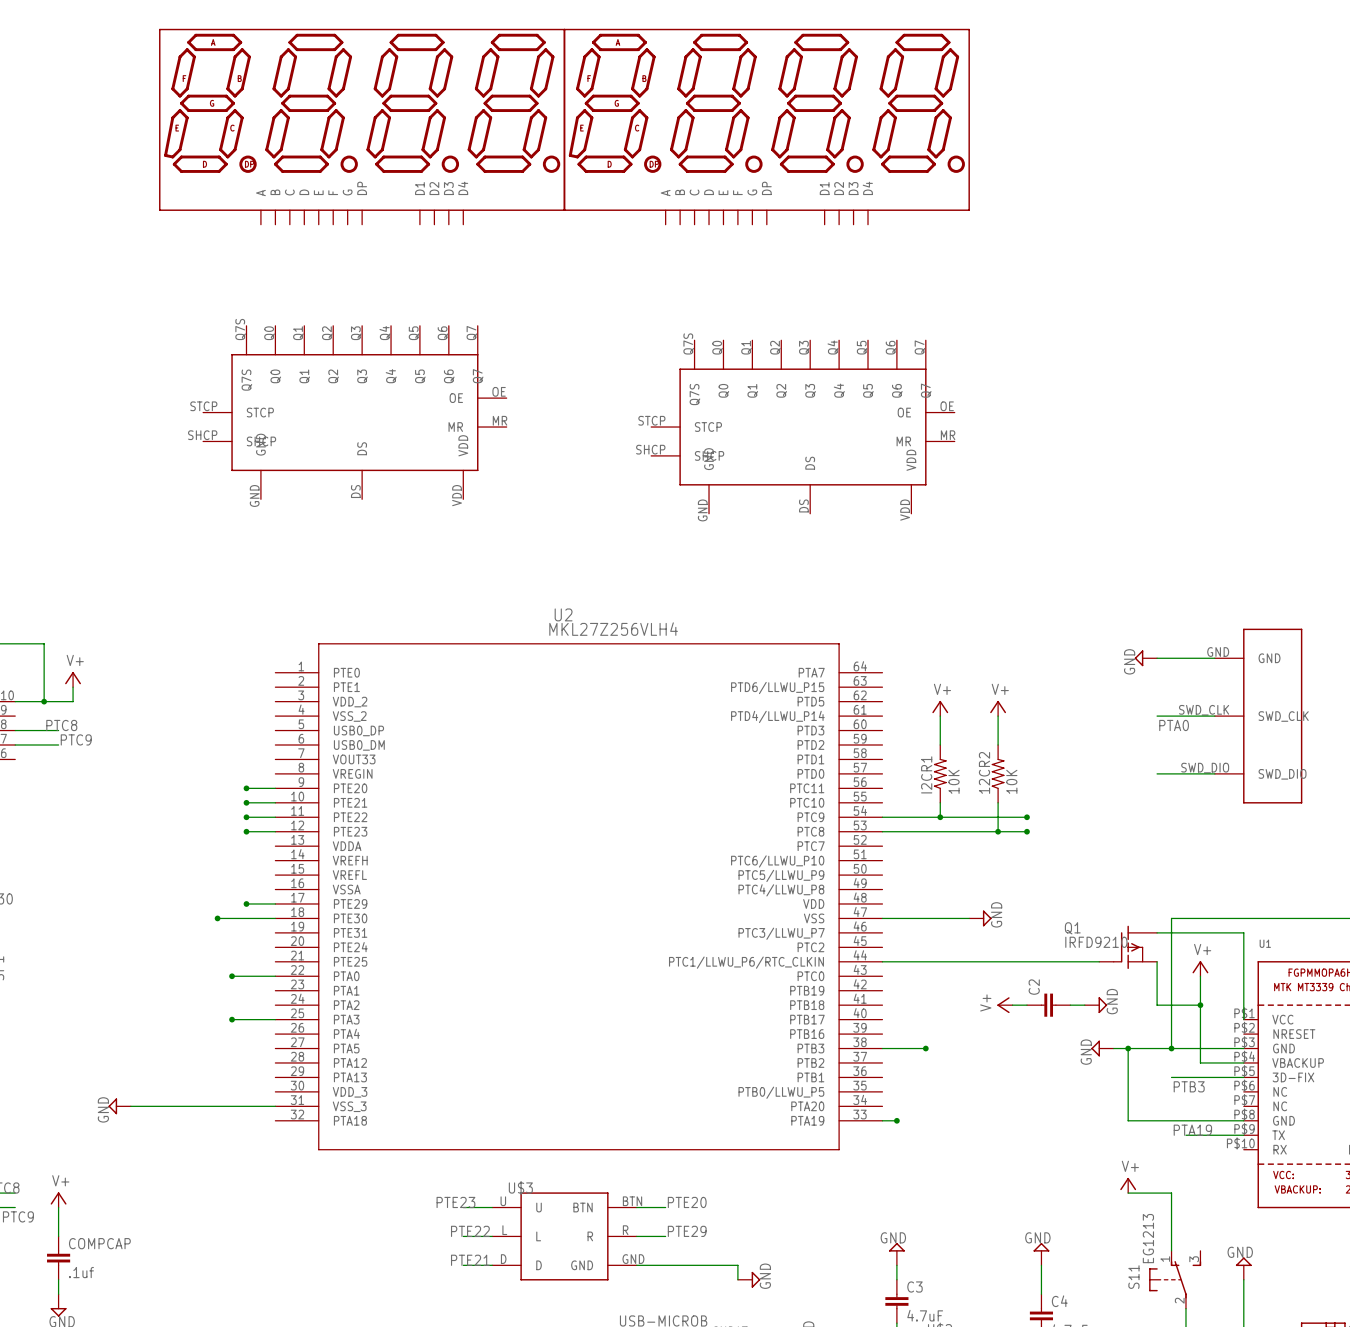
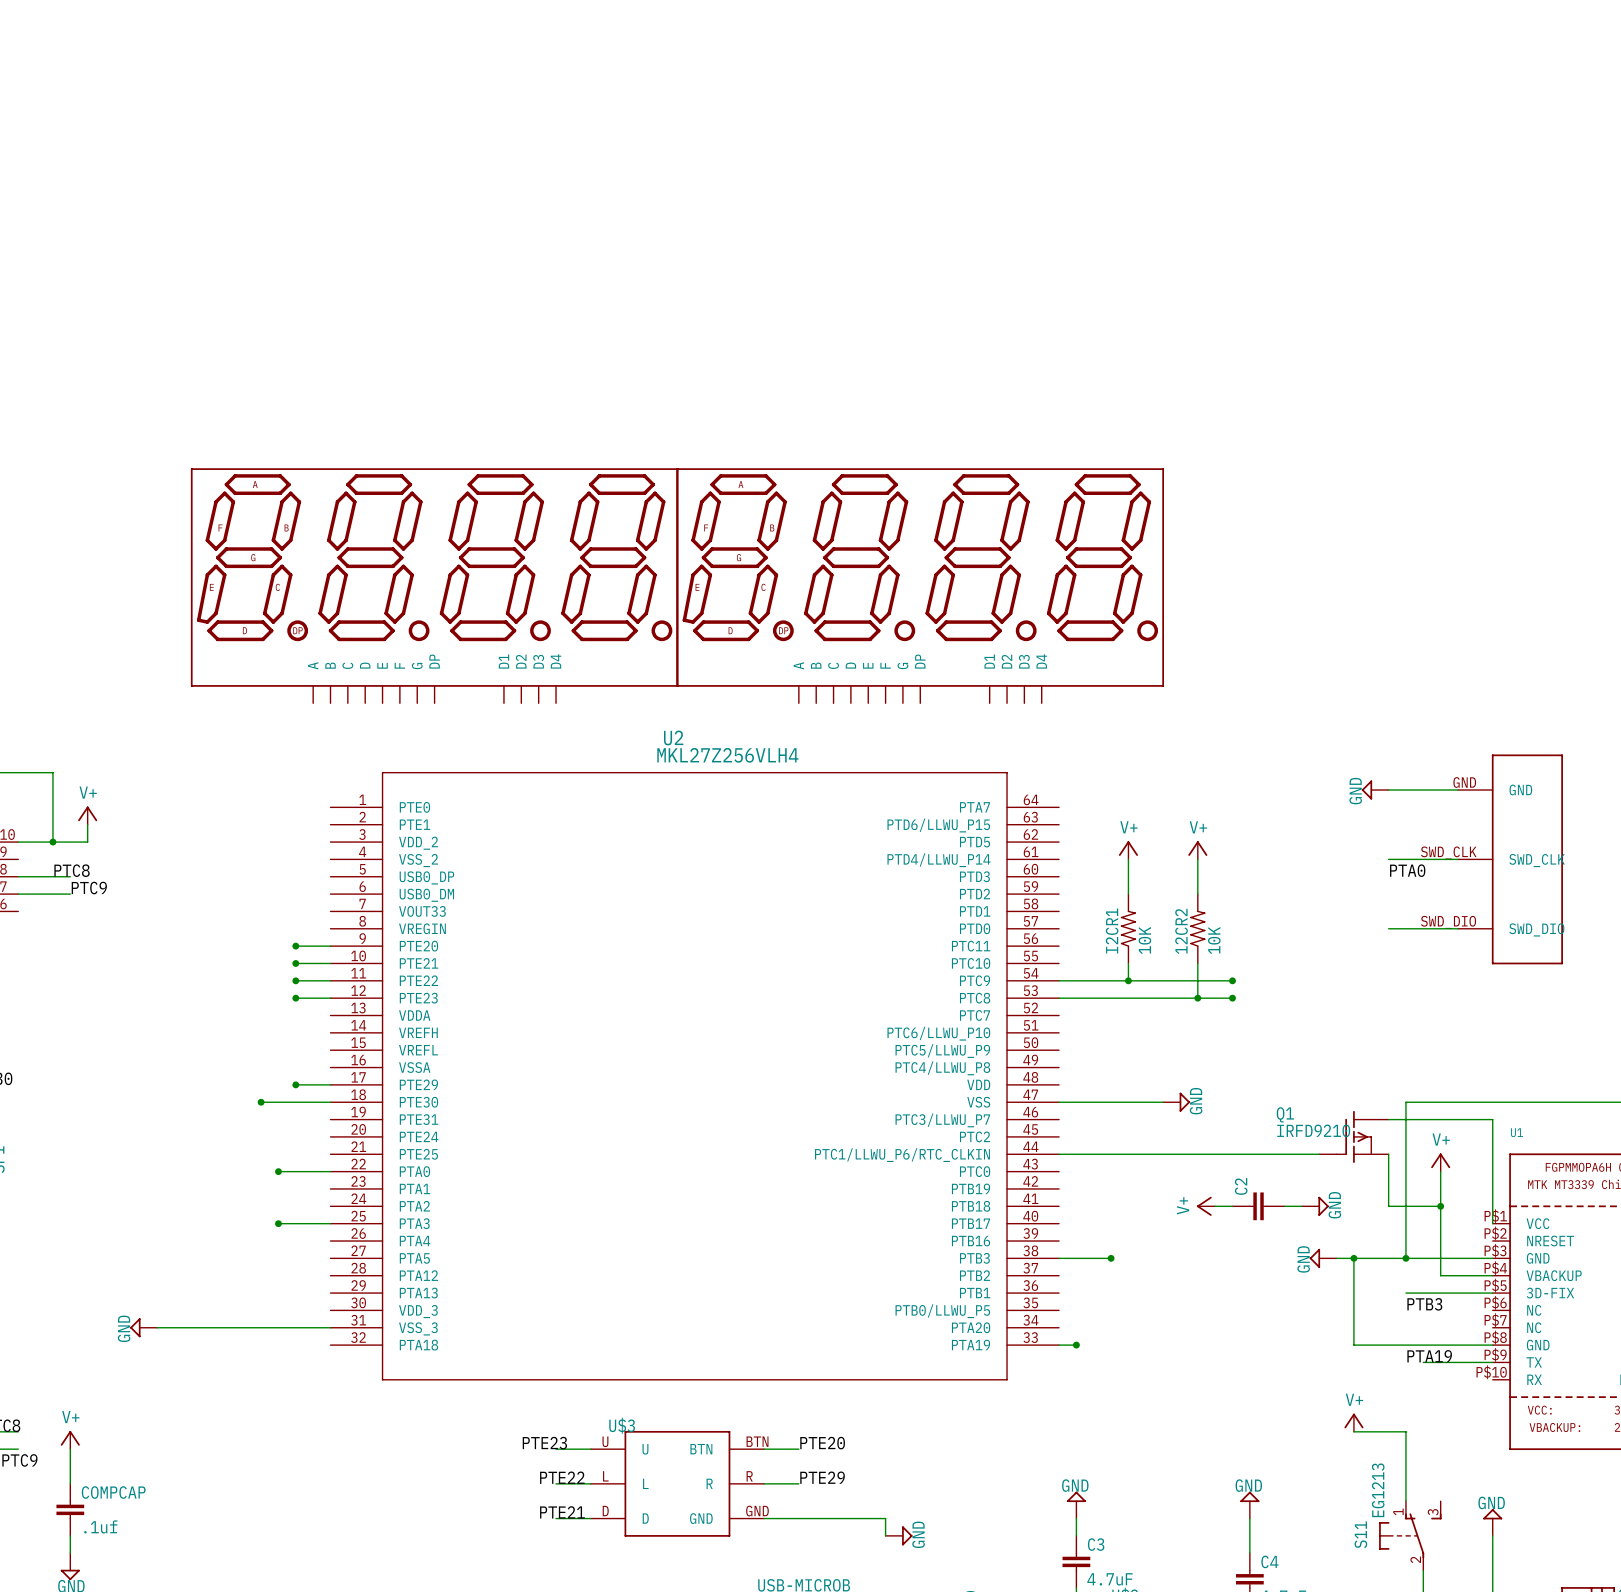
part: (362, 126) -> none
part: (766, 126) -> none
part: (354, 412) -> none
part: (802, 427) -> none
part: none -> (434, 585)
part: none -> (920, 585)

